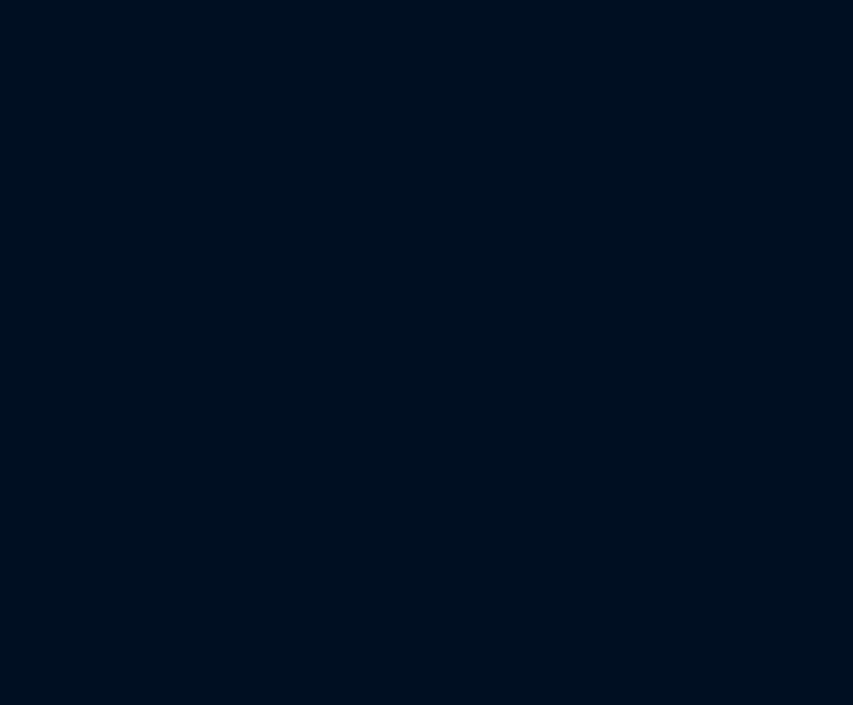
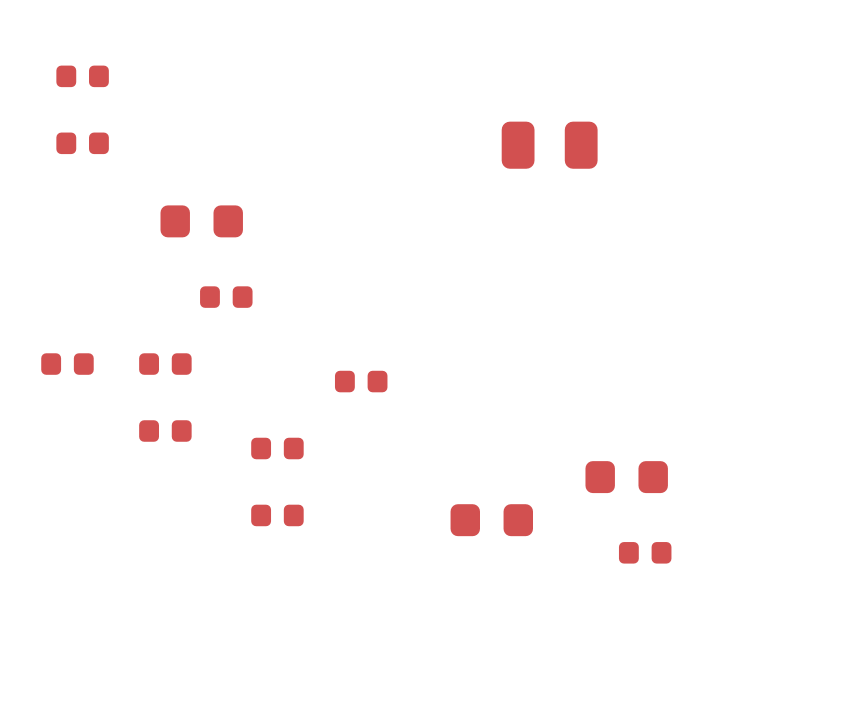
part: none -> (82, 76)
part: none -> (82, 143)
part: none -> (549, 145)
part: none -> (201, 221)
part: none -> (226, 297)
part: none -> (67, 364)
part: none -> (165, 364)
part: none -> (361, 381)
part: none -> (165, 431)
part: none -> (277, 448)
part: none -> (626, 477)
part: none -> (277, 515)
part: none -> (491, 520)
part: none -> (645, 552)

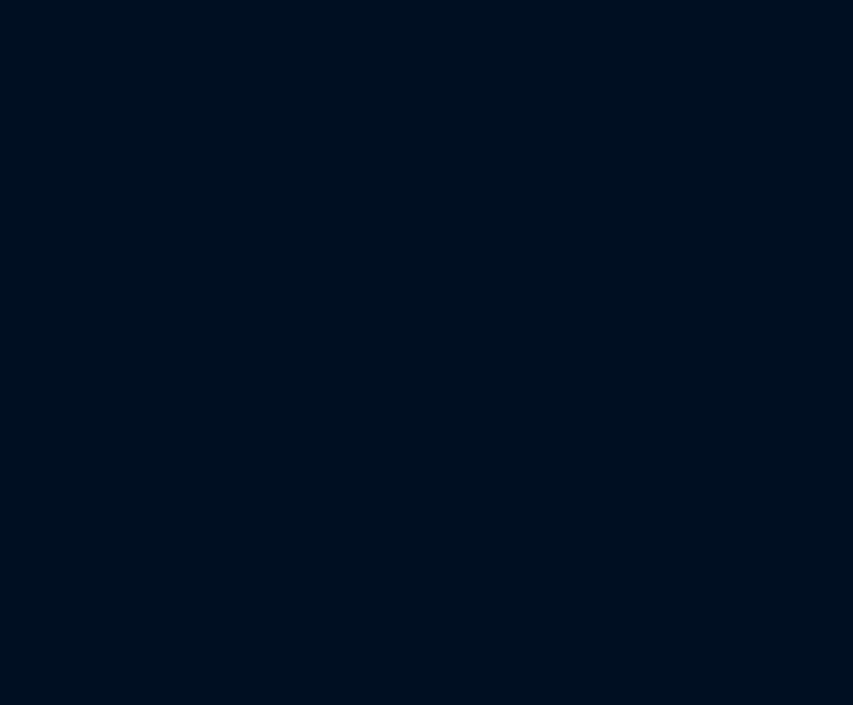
part: (82, 76) -> none
part: (82, 143) -> none
part: (549, 145) -> none
part: (201, 221) -> none
part: (226, 297) -> none
part: (67, 364) -> none
part: (165, 364) -> none
part: (361, 381) -> none
part: (165, 431) -> none
part: (277, 448) -> none
part: (626, 477) -> none
part: (277, 515) -> none
part: (491, 520) -> none
part: (645, 552) -> none

